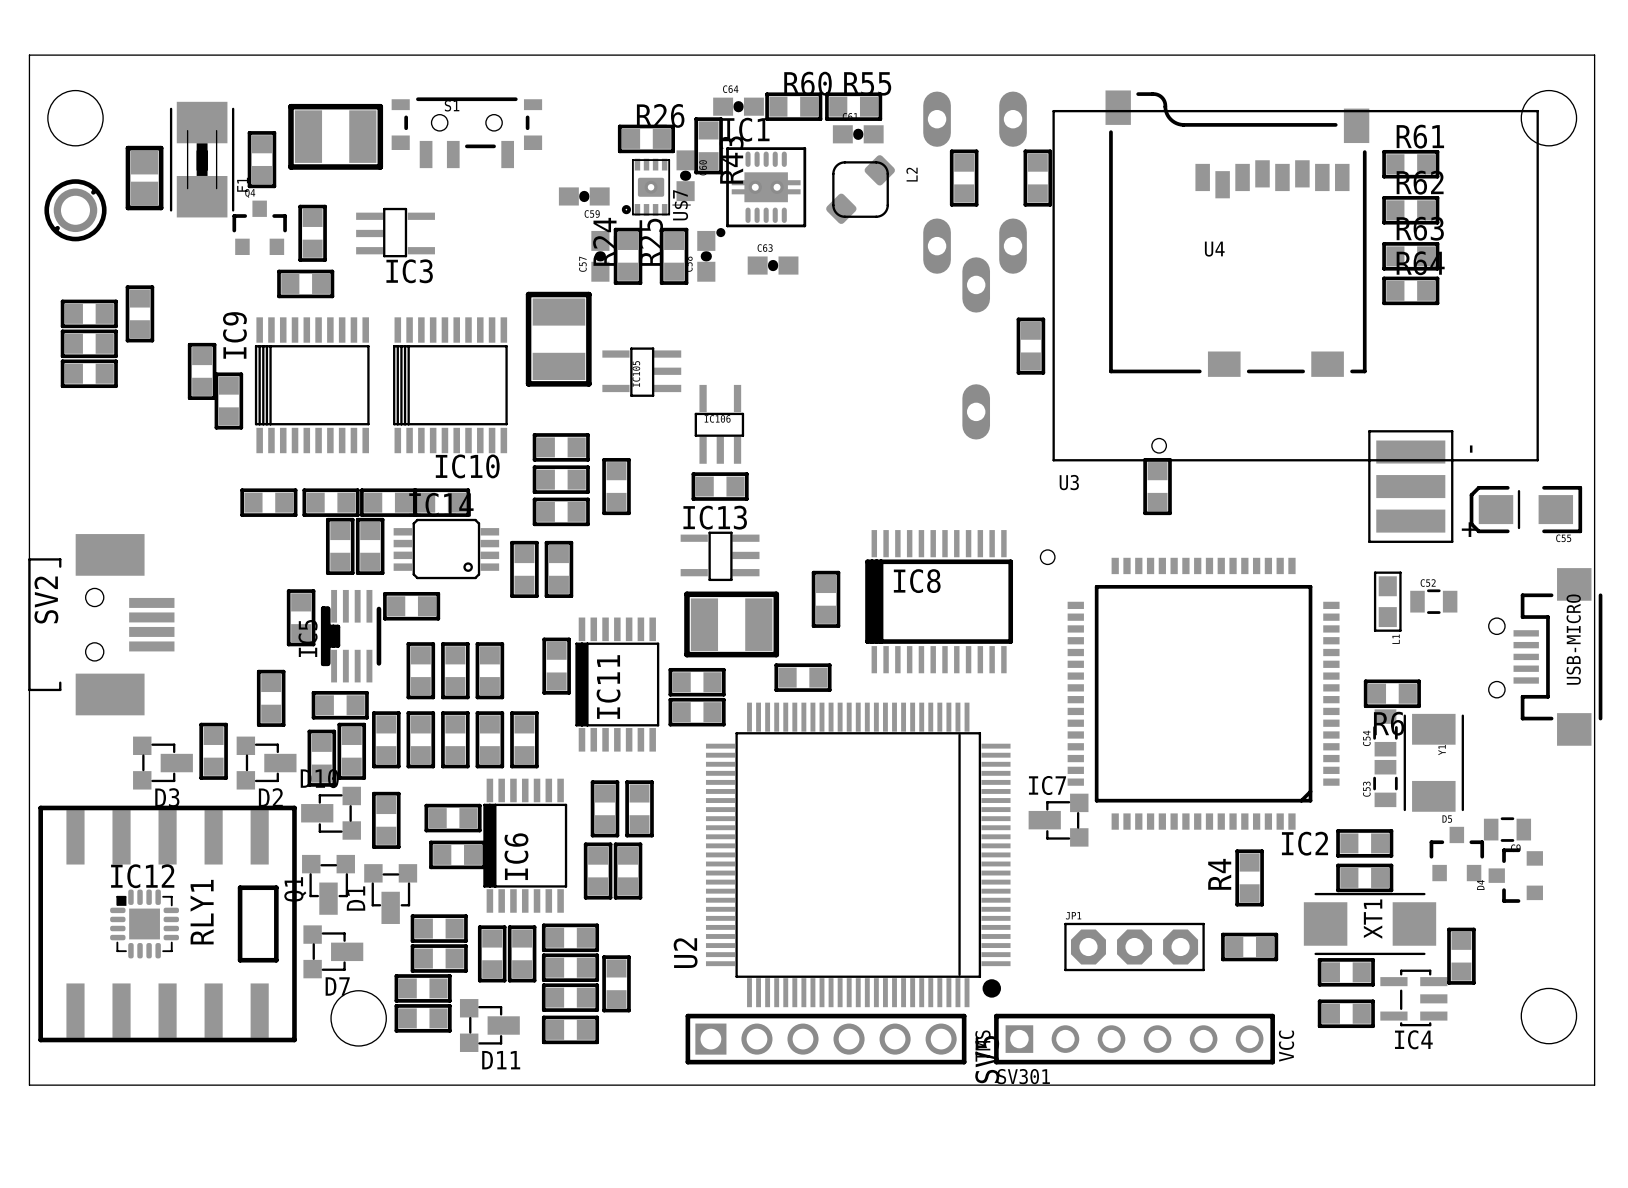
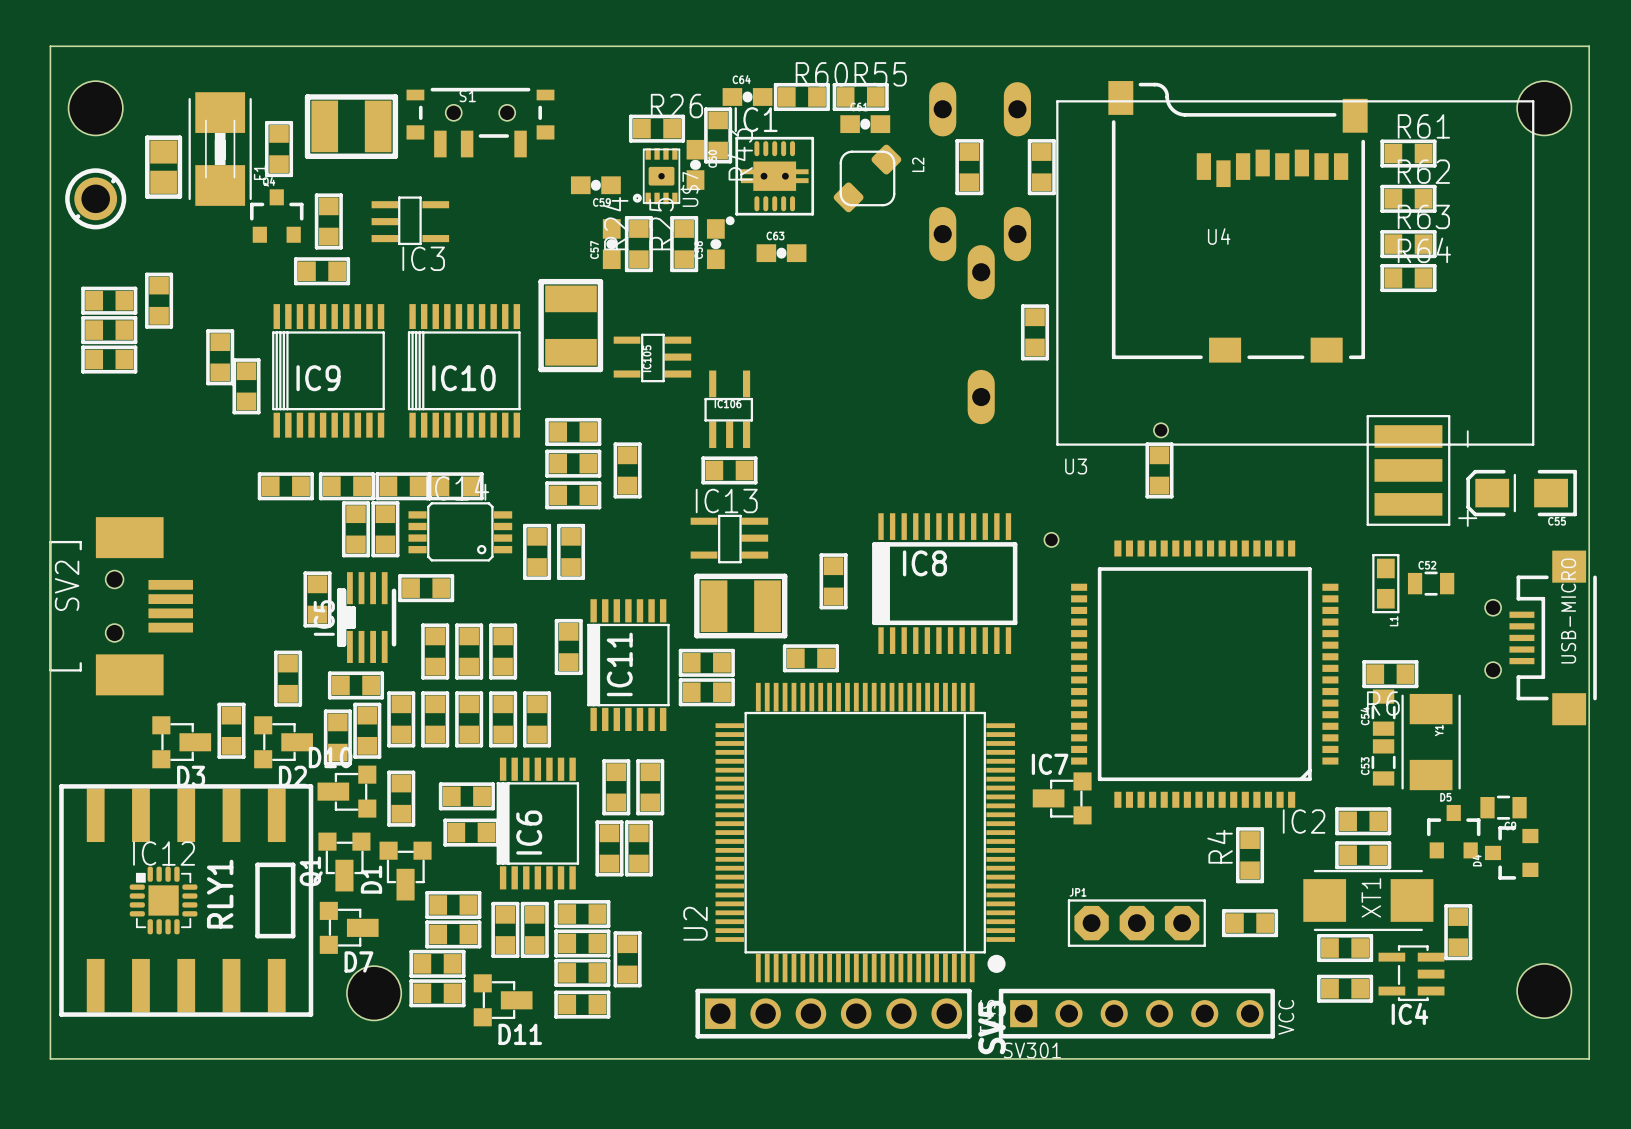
IC9 name rotation: 0° (234, 335) -> 90° clockwise (318, 378)
IC9 name position: IC9 (234, 335) -> IC9 (318, 378)
IC10 name position: IC10 (467, 466) -> IC10 (463, 378)

